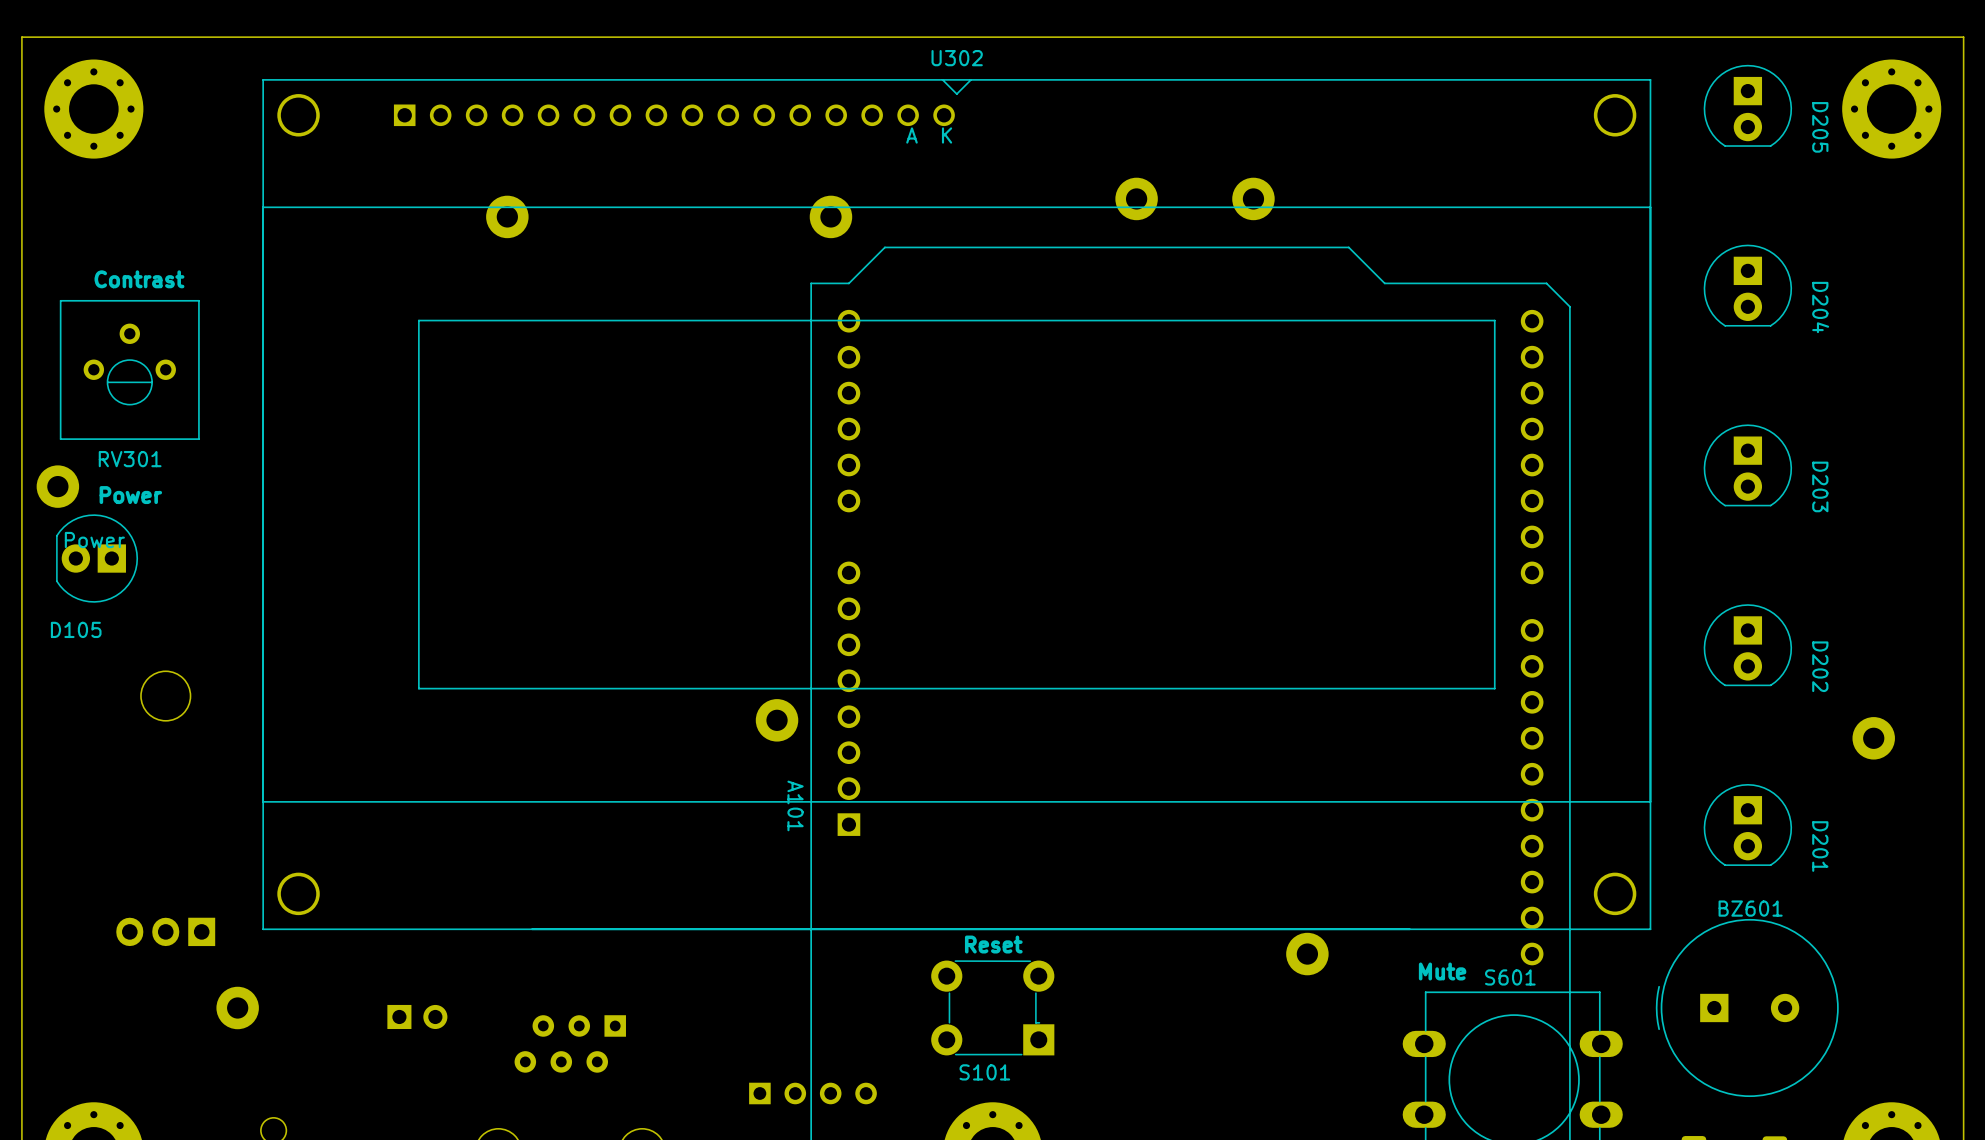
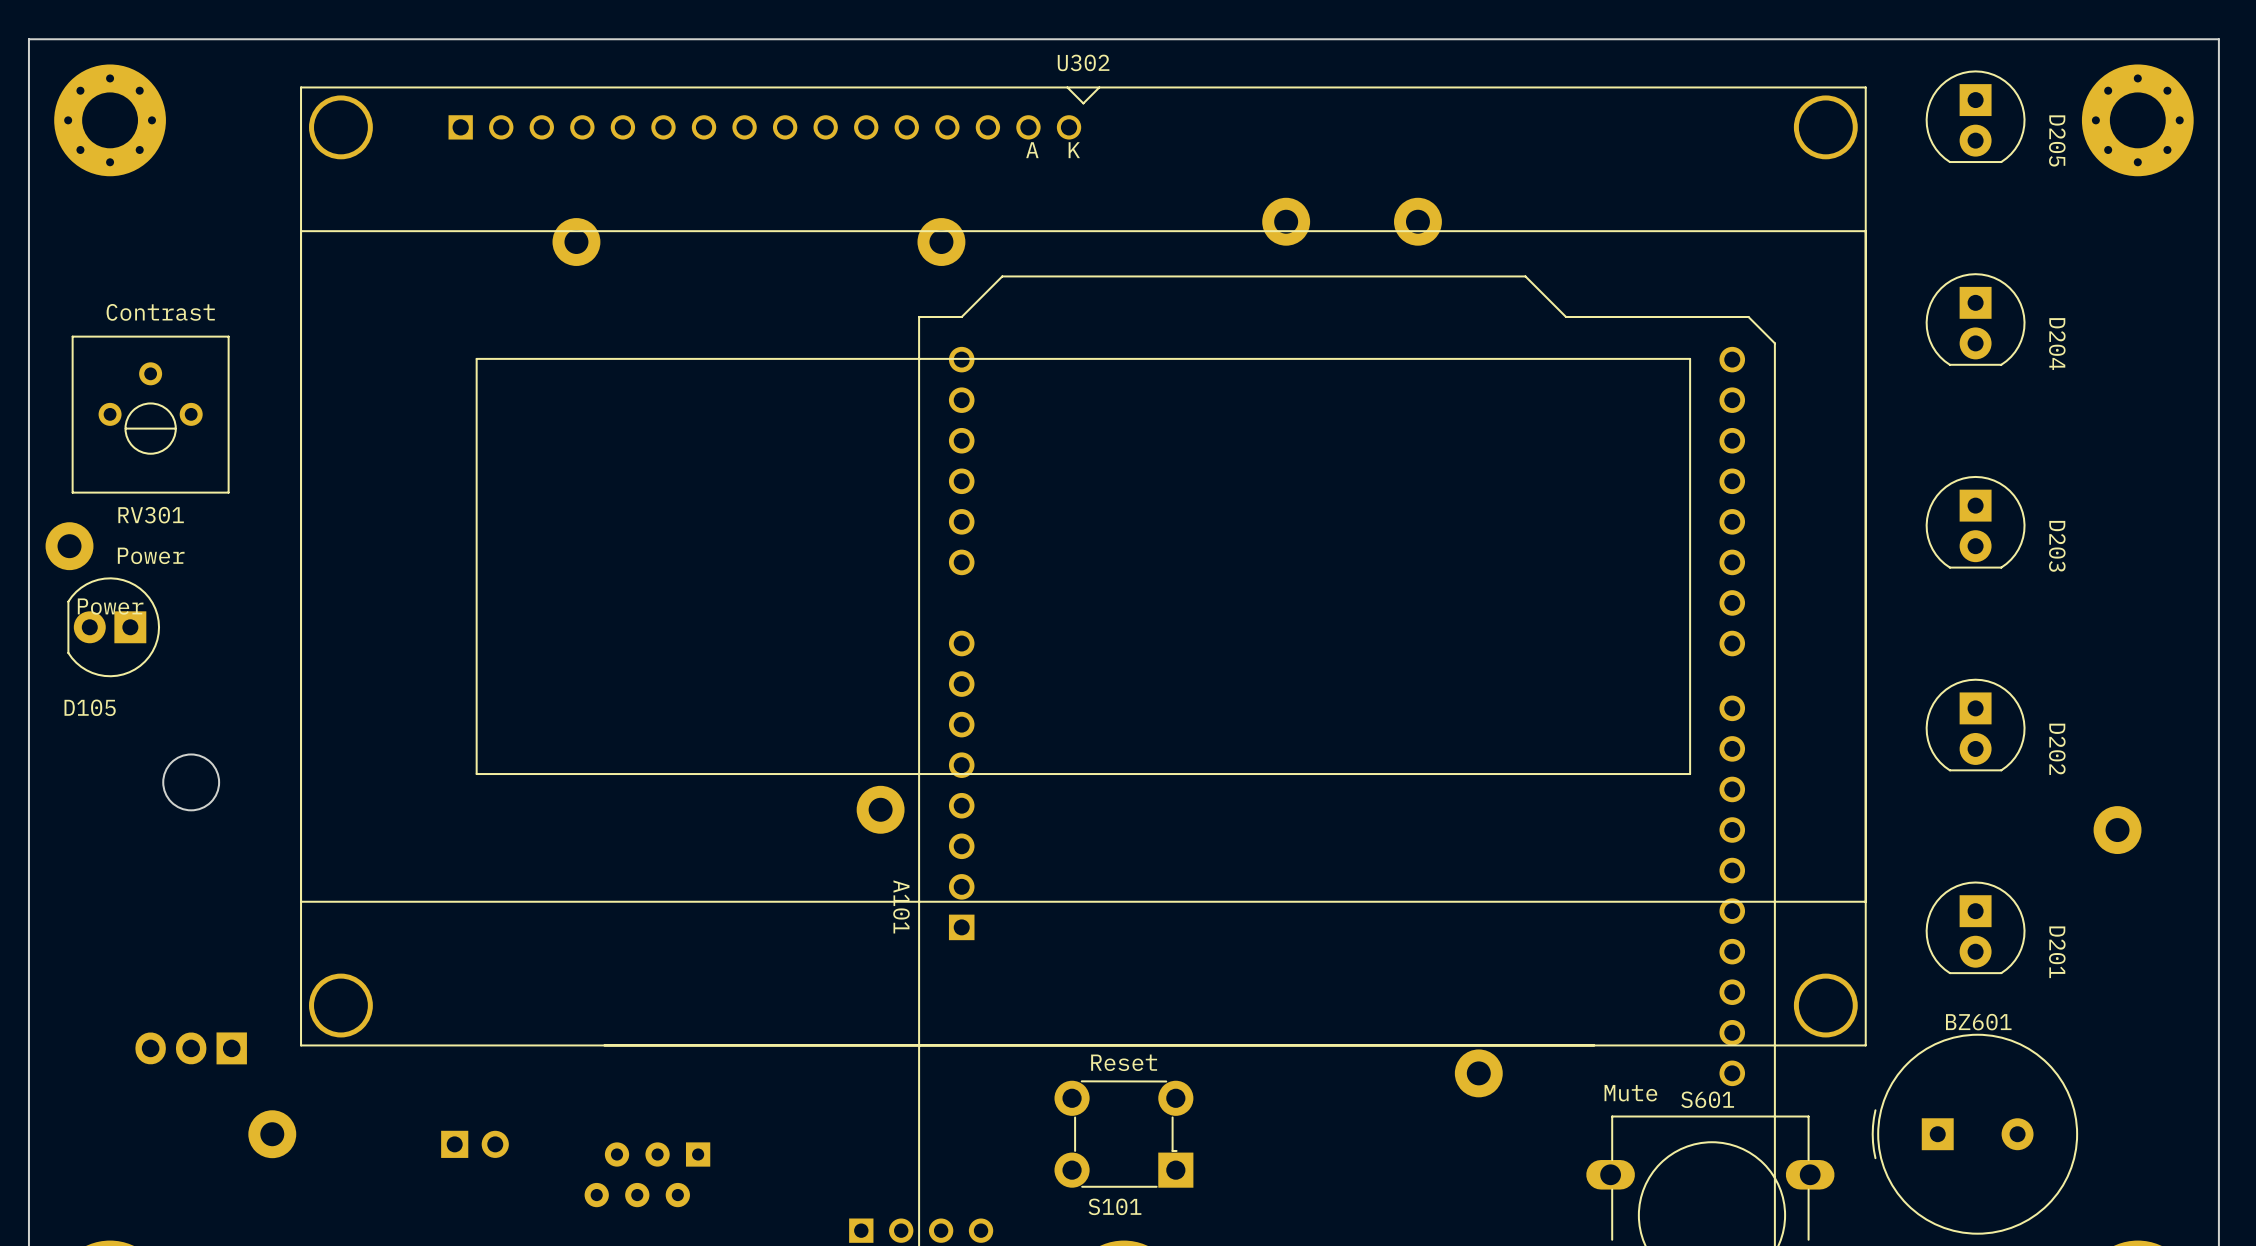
U302 footprint: [262, 79, 1652, 931] -> [300, 86, 1867, 1047]

